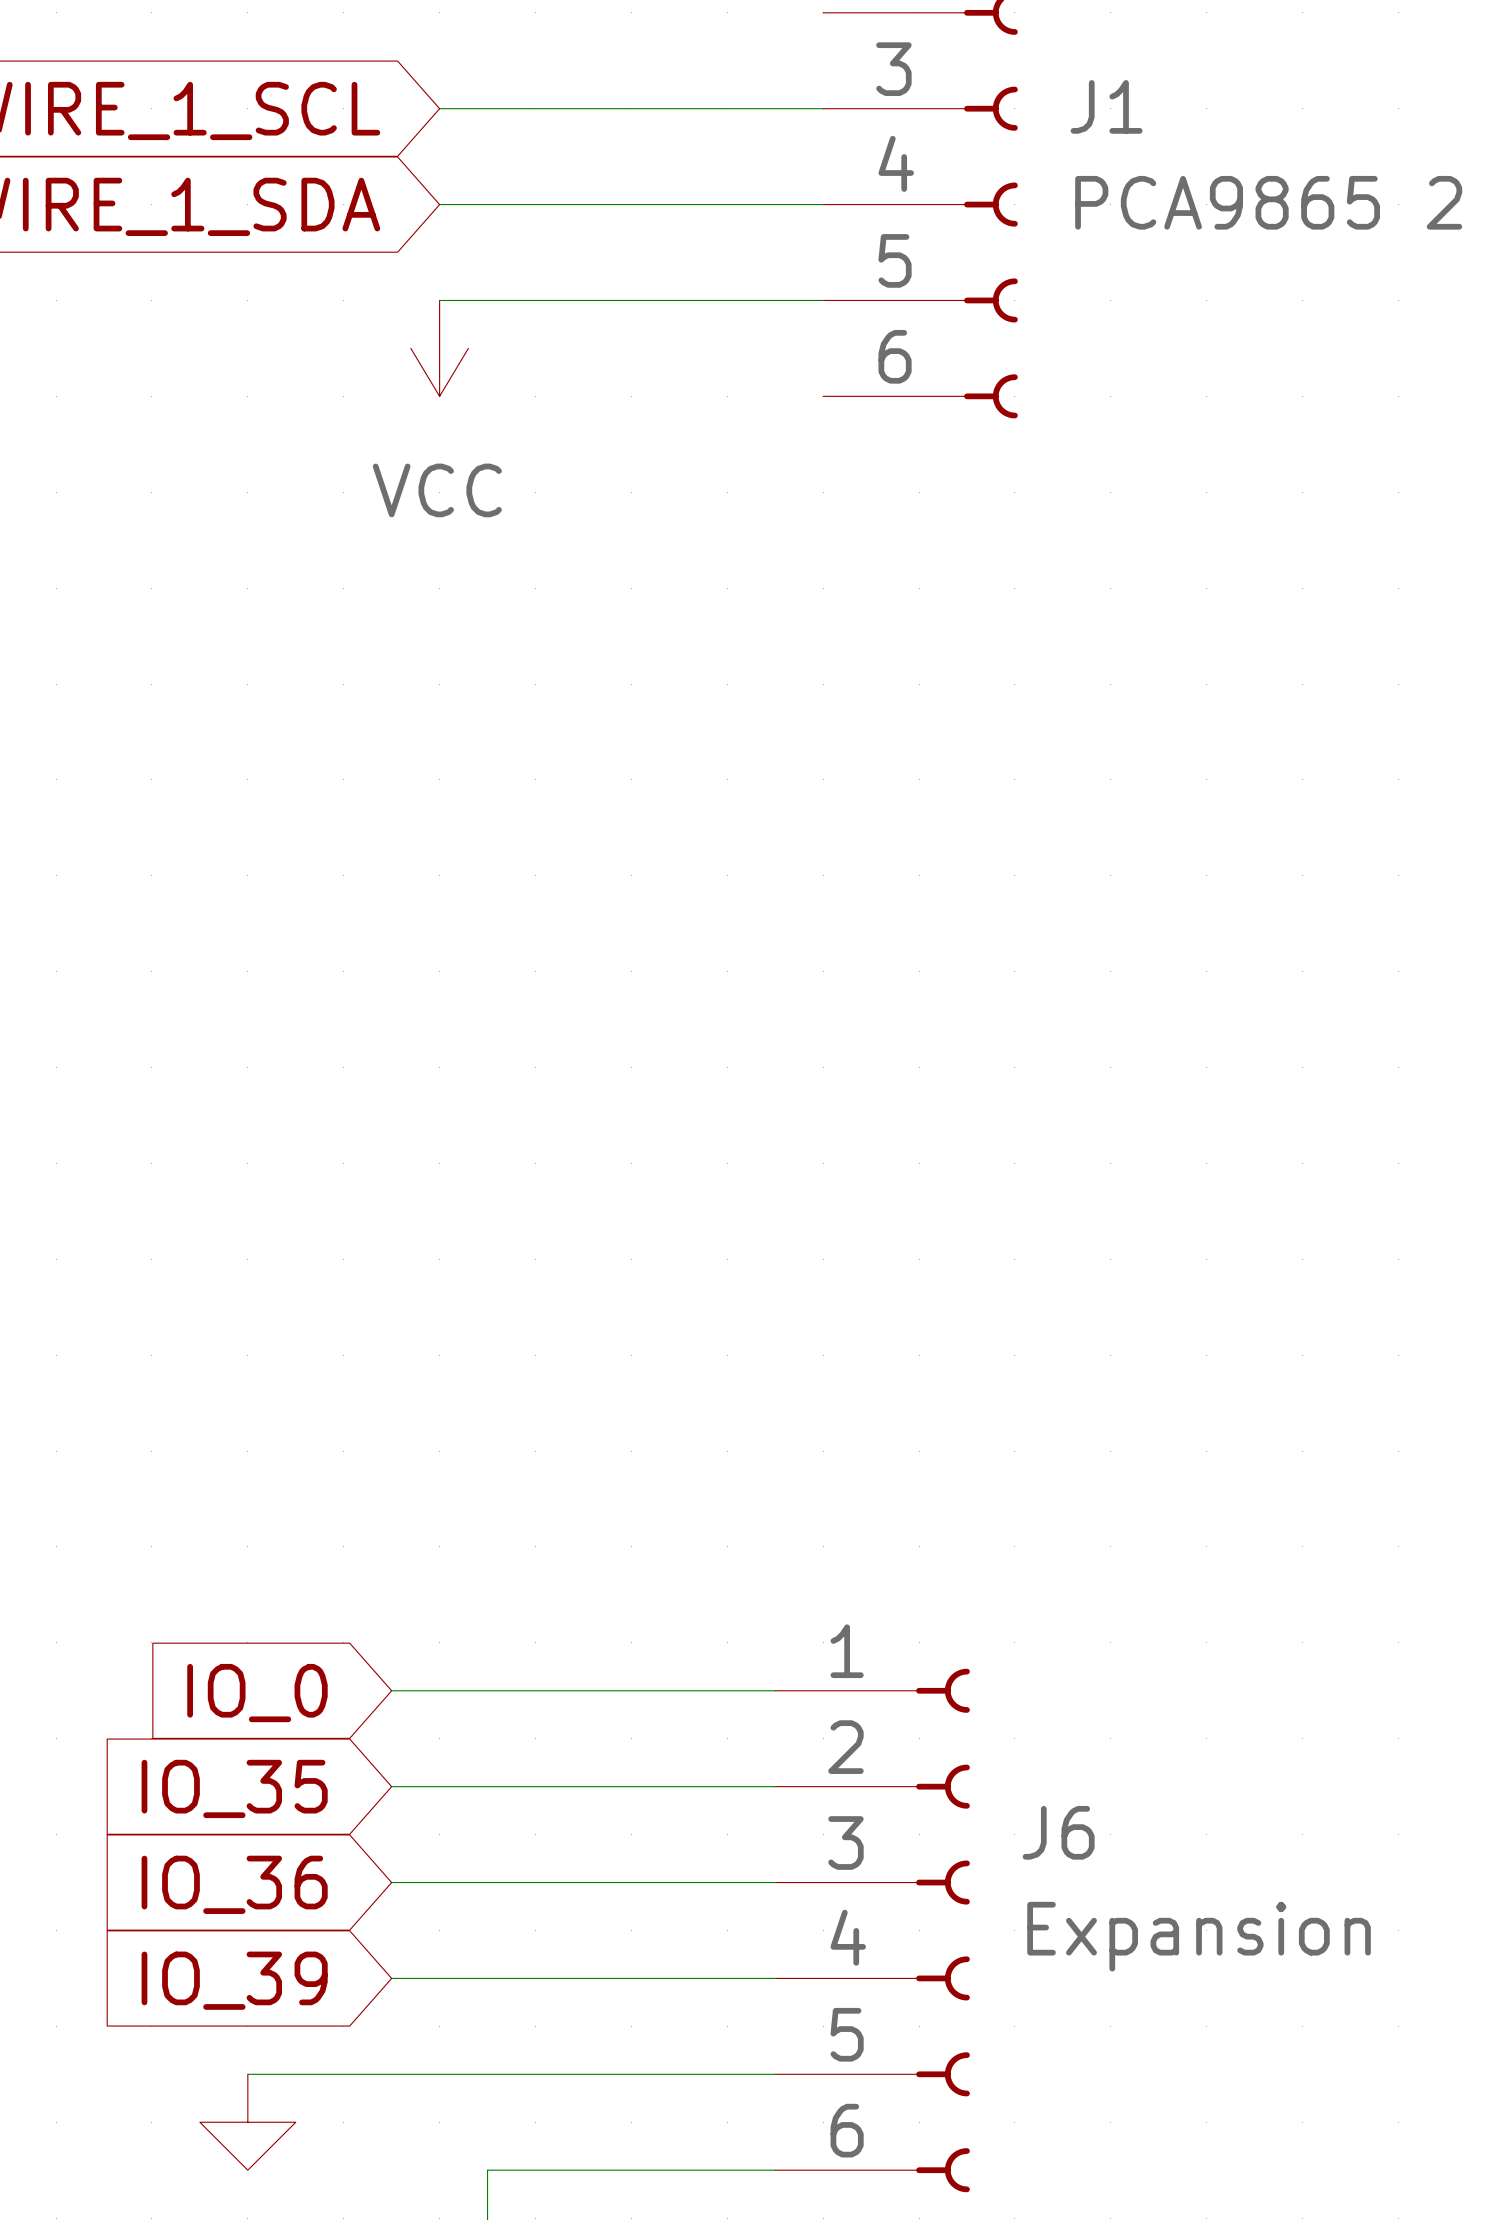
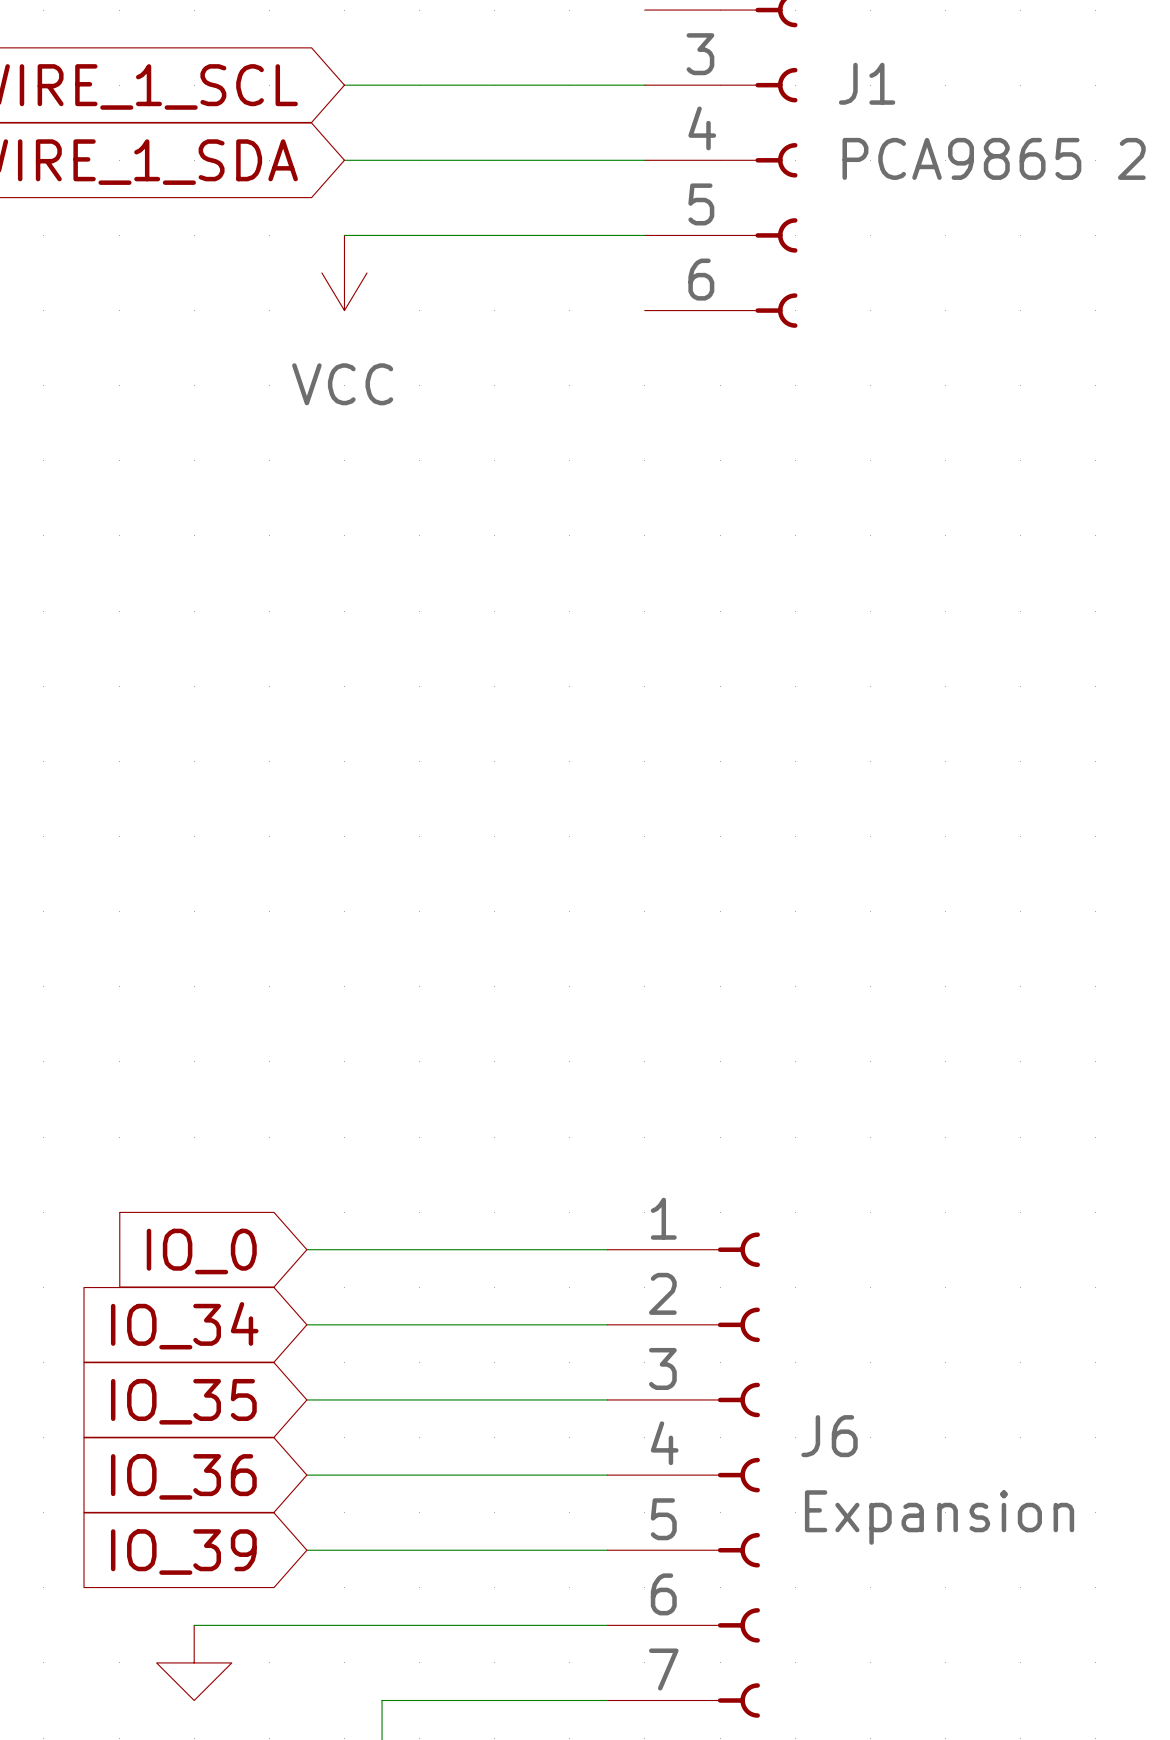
wire: none -> (306, 1249) (607, 1249)
global label: none -> IO_0 (201, 1251)
J6 symbol: [775, 1668, 970, 2193] -> [607, 1232, 760, 1718]
global label: IO_0 (257, 1693) -> IO_34 (184, 1325)

